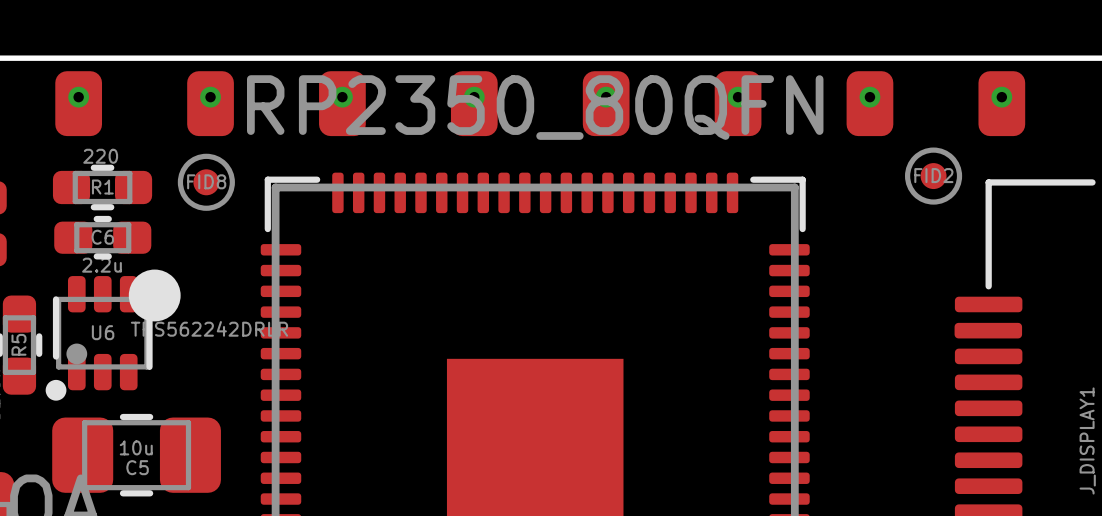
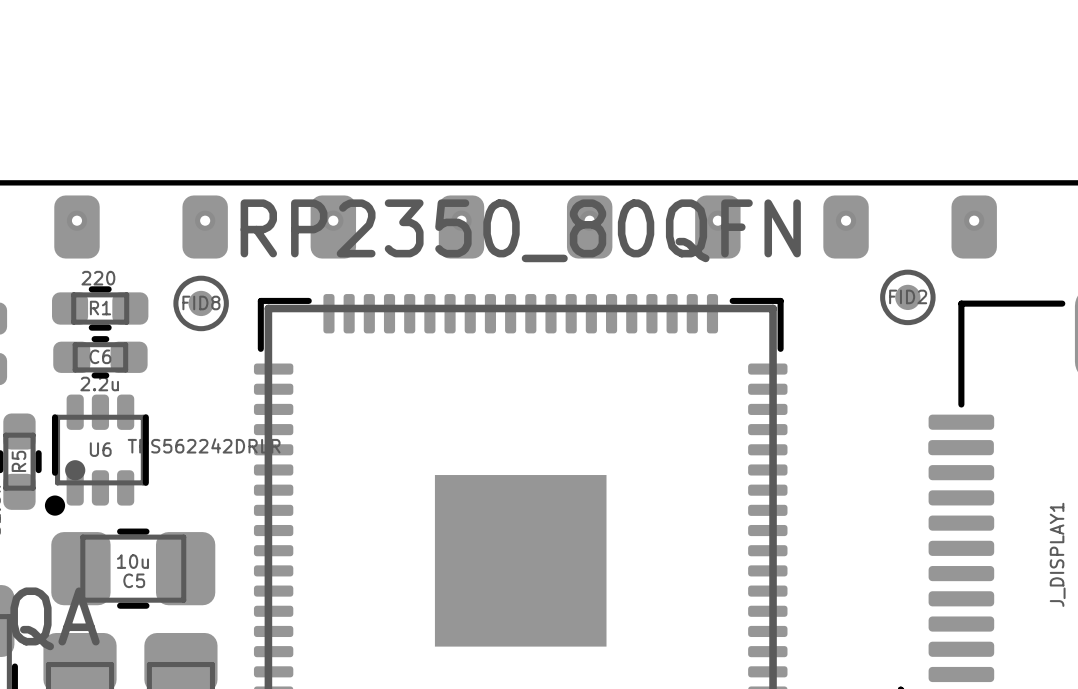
drawing: [128, 269, 181, 322] -> none

